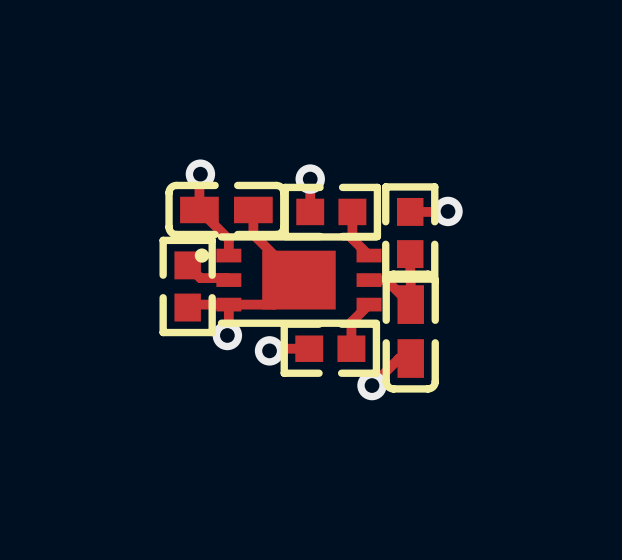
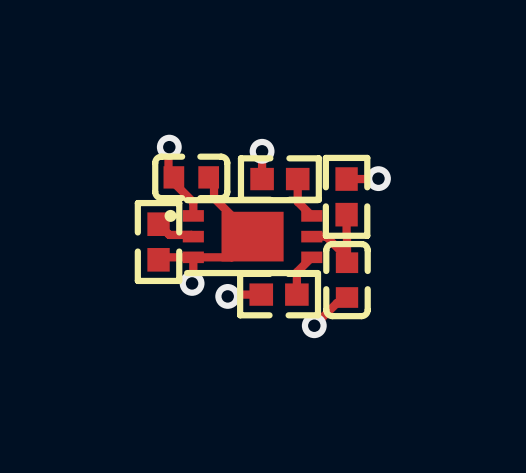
part footprint: [165, 181, 288, 239] -> [152, 153, 231, 202]
part footprint: [382, 270, 439, 393] -> [323, 240, 371, 320]

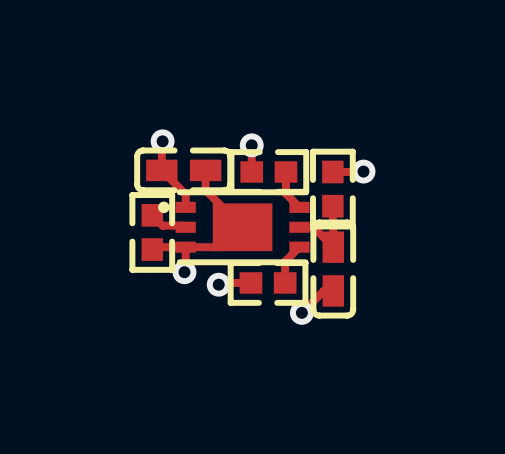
part footprint: [152, 153, 231, 202] -> [134, 147, 234, 194]
part footprint: [323, 240, 371, 320] -> [310, 219, 357, 319]

